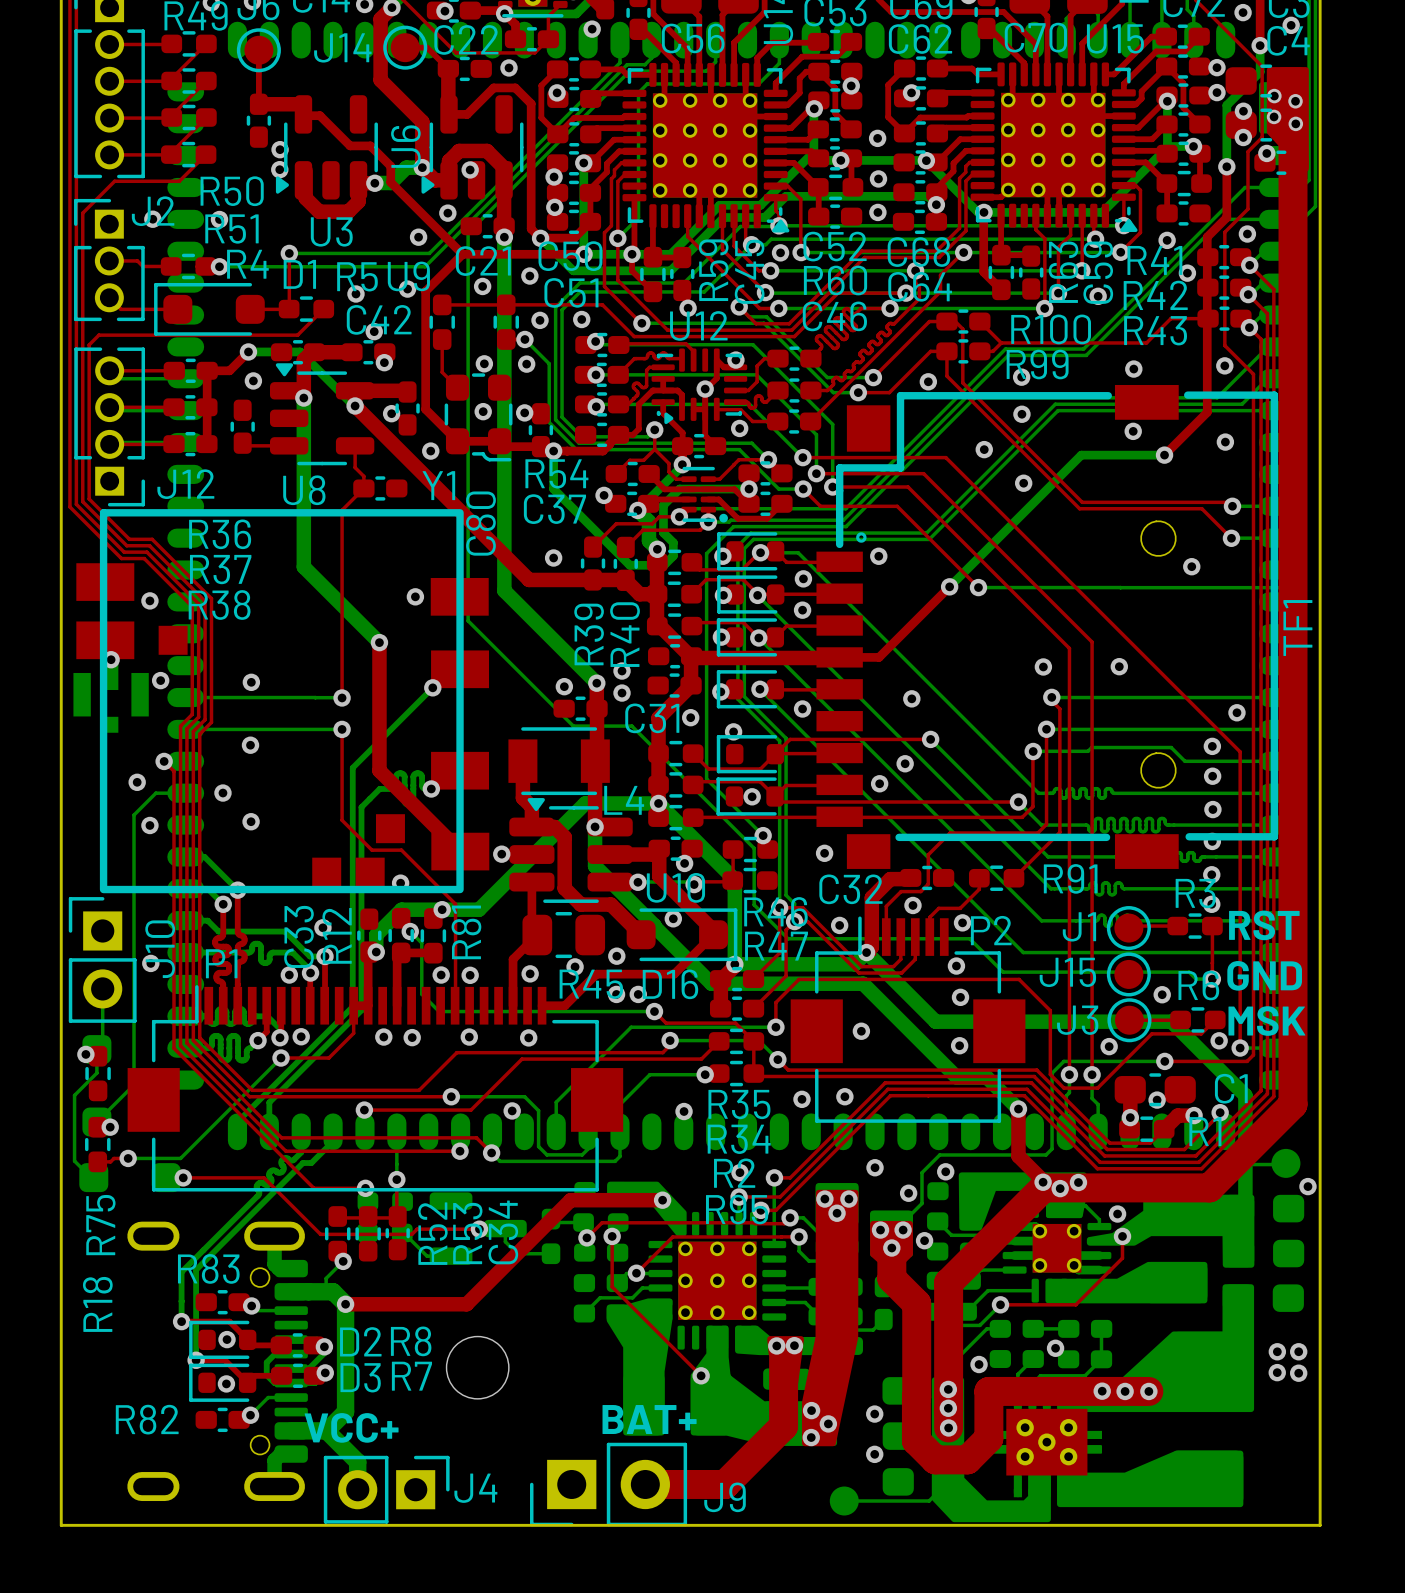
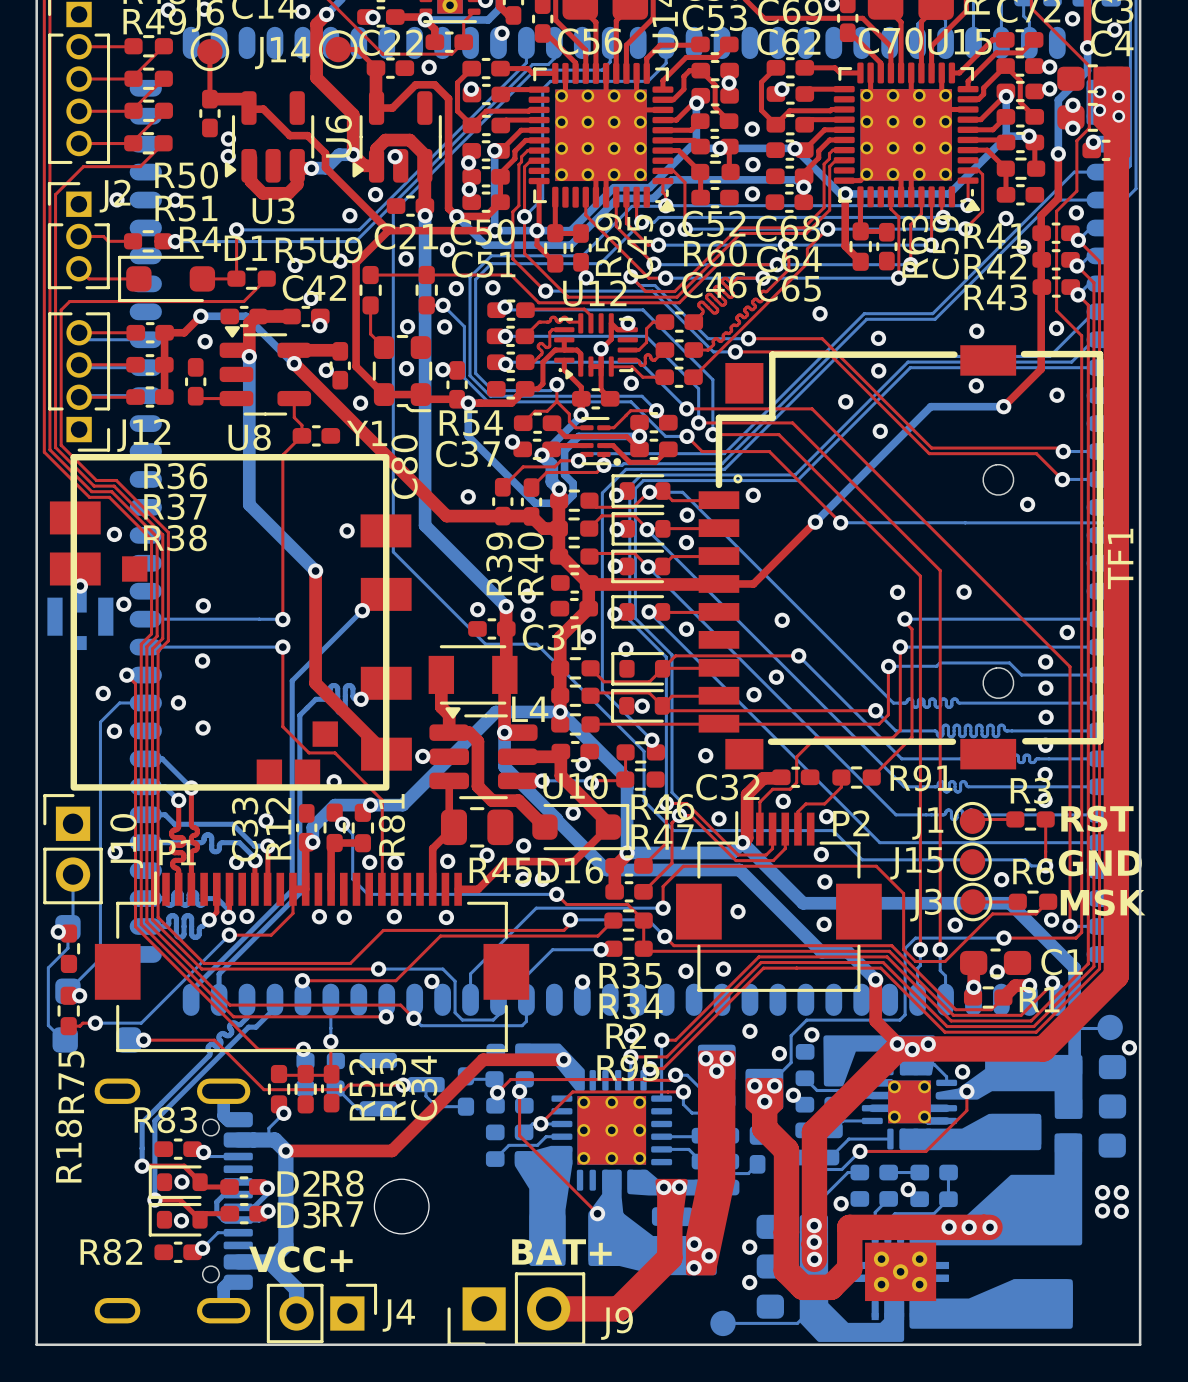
via: (1098, 296) -> none
top track: (1208, 318) (1170, 318) (1146, 342) (1001, 342) -> none
C65 name: none -> C65 (788, 288)
R100: (963, 321) -> none
top track: (979, 321) (1001, 343) -> none
top track: (1001, 342) (992, 351) (979, 351) -> none
R99: (963, 351) -> none
top track: (873, 377) (929, 321) (955, 321) (962, 329) (962, 382) -> (748, 338) (822, 338) (826, 343)
via position: (928, 381) -> (820, 313)
top track: (889, 392) (930, 351) (946, 351) (946, 376) (963, 392) -> (762, 351) (827, 351)

